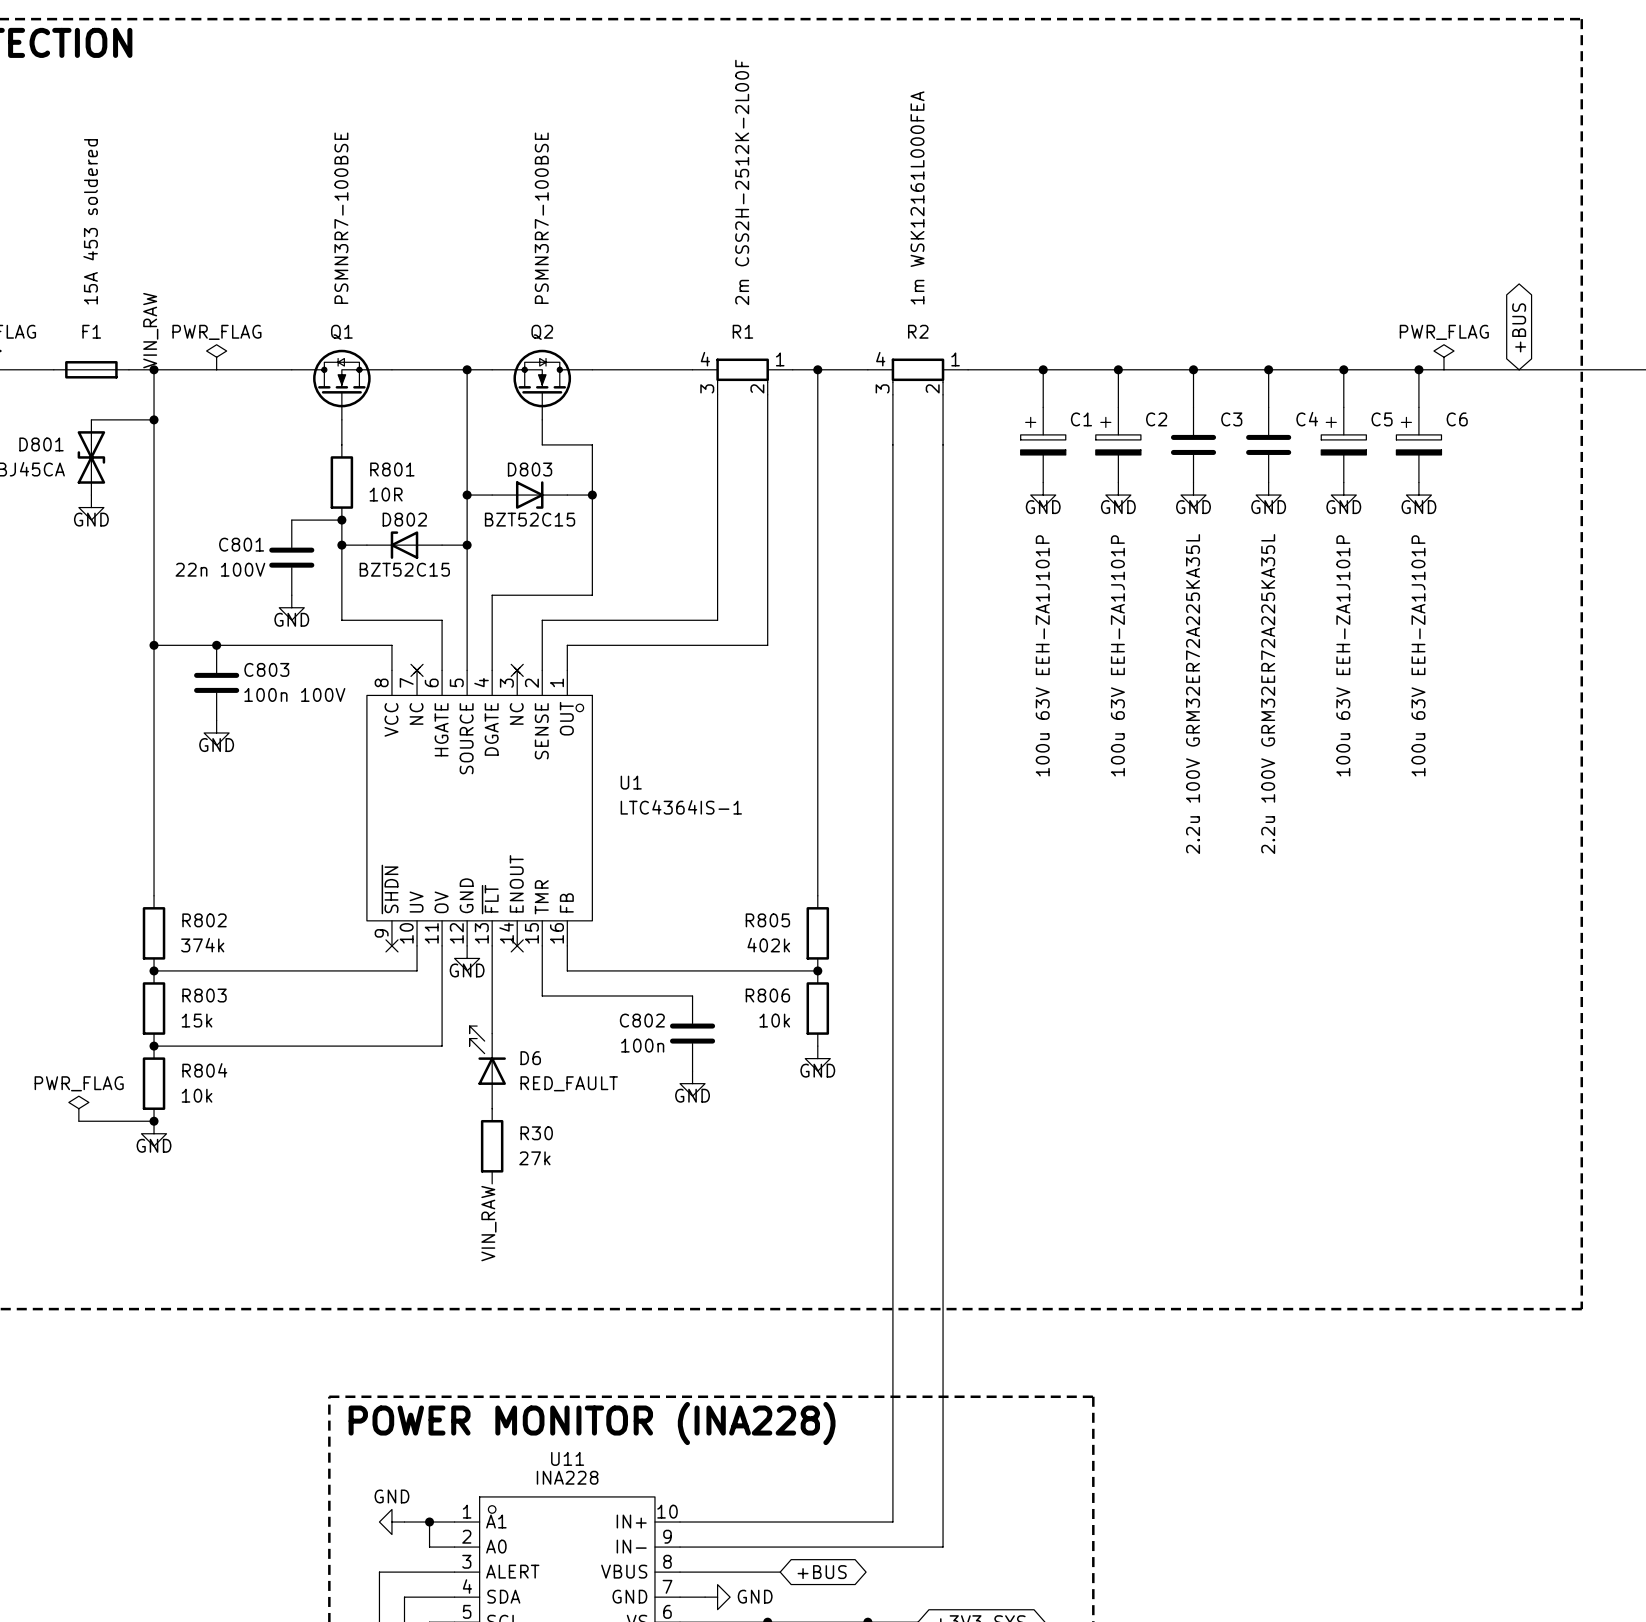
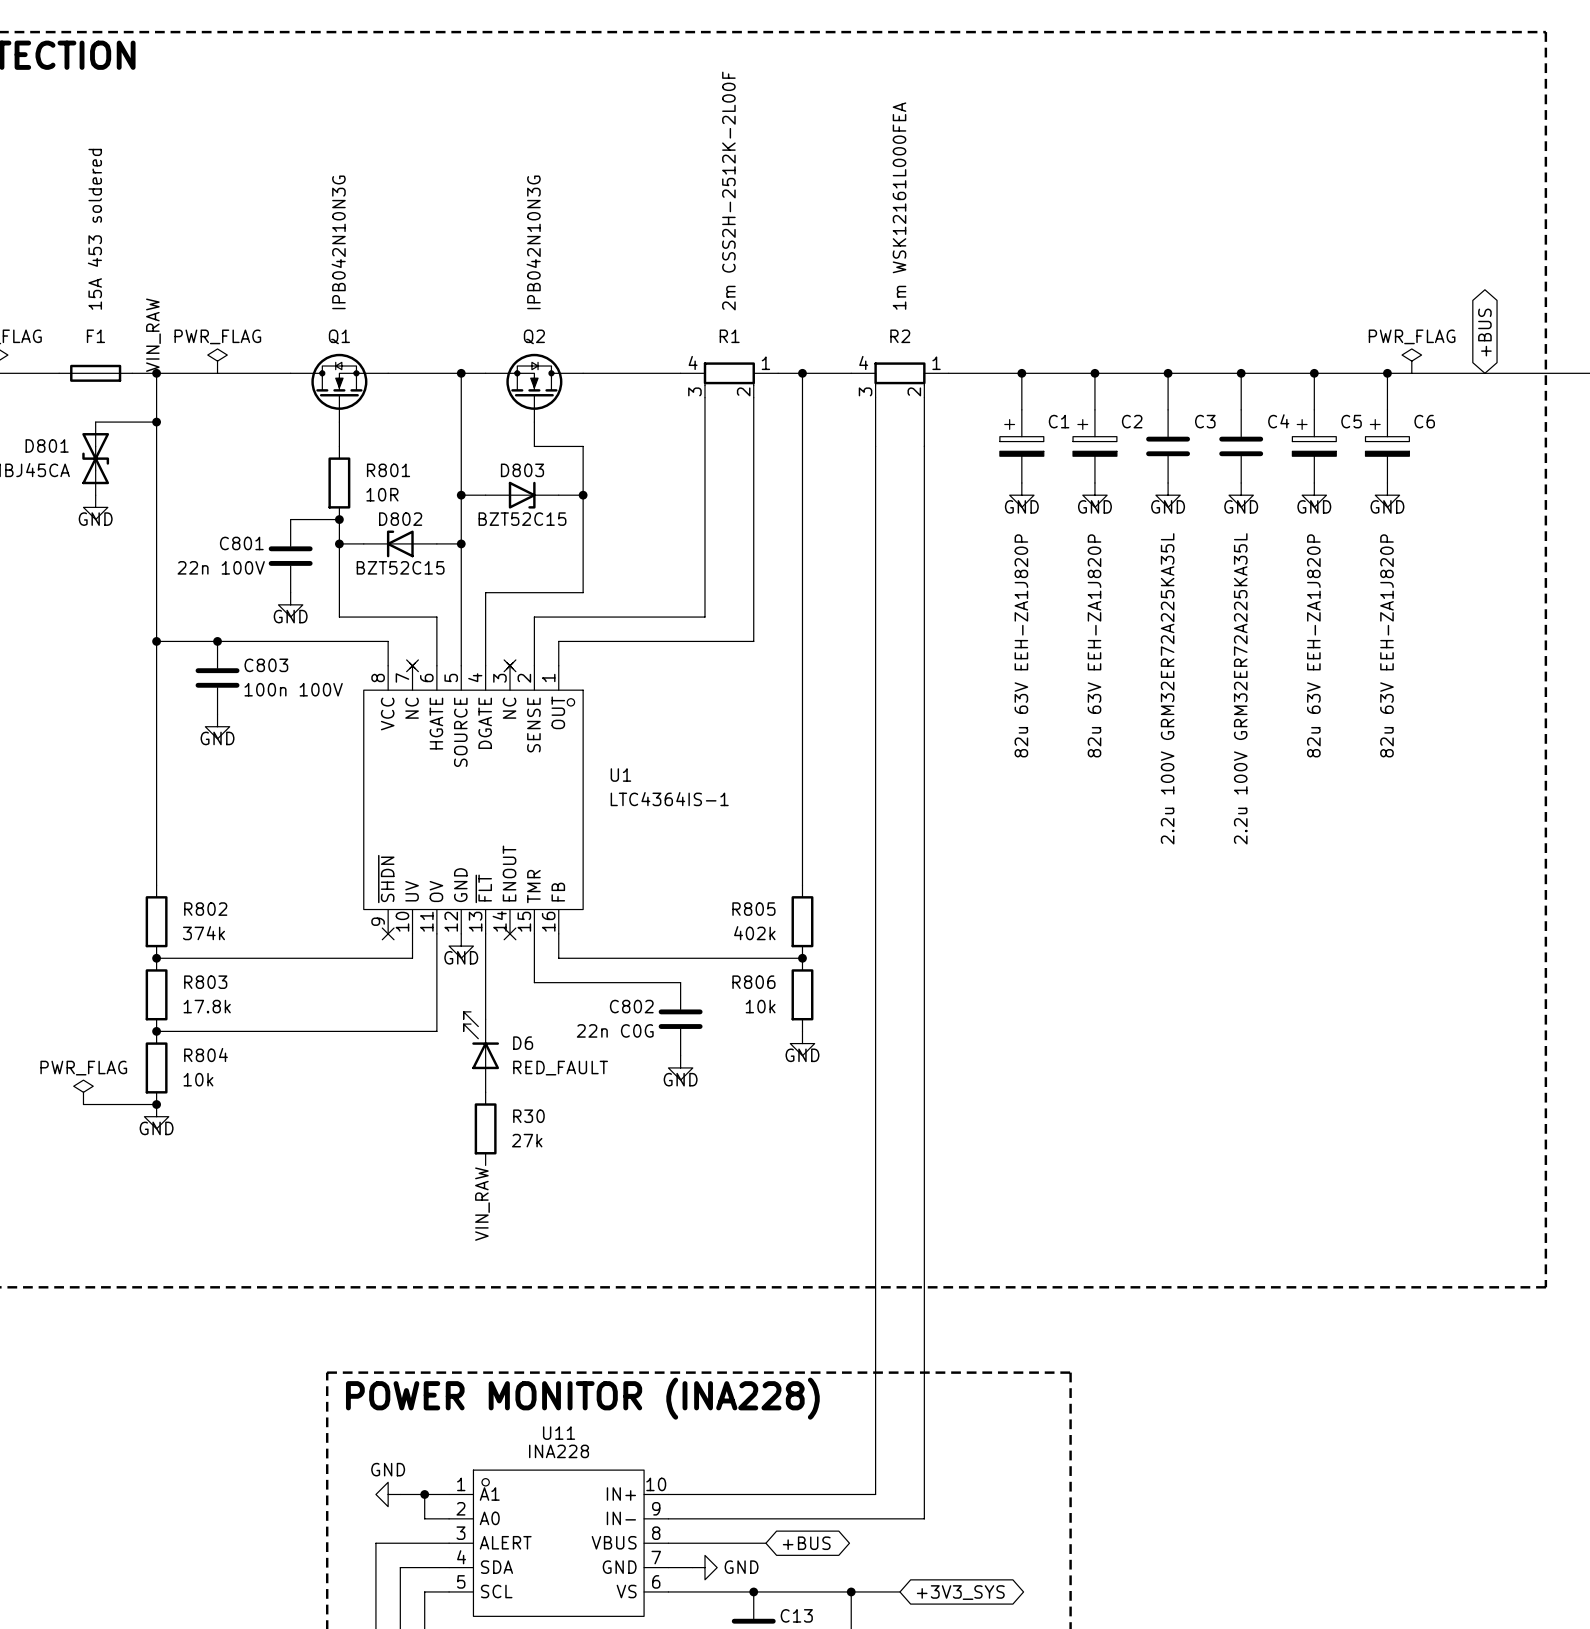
Q1 value: PSMN3R7-100BSE (341, 218) -> IPB042N10N3G (338, 242)
Q2 value: PSMN3R7-100BSE (541, 218) -> IPB042N10N3G (533, 242)
C1 value: 100u 63V EEH-ZA1J101P (1042, 655) -> 82u 63V EEH-ZA1J820P (1021, 645)
C2 value: 100u 63V EEH-ZA1J101P (1117, 655) -> 82u 63V EEH-ZA1J820P (1094, 645)
C5 value: 100u 63V EEH-ZA1J101P (1343, 655) -> 82u 63V EEH-ZA1J820P (1313, 645)
C6 value: 100u 63V EEH-ZA1J101P (1418, 655) -> 82u 63V EEH-ZA1J820P (1386, 645)
R803 value: 15k (197, 1020) -> 17.8k (207, 1006)
C802 value: 100n (642, 1045) -> 22n C0G (615, 1030)

